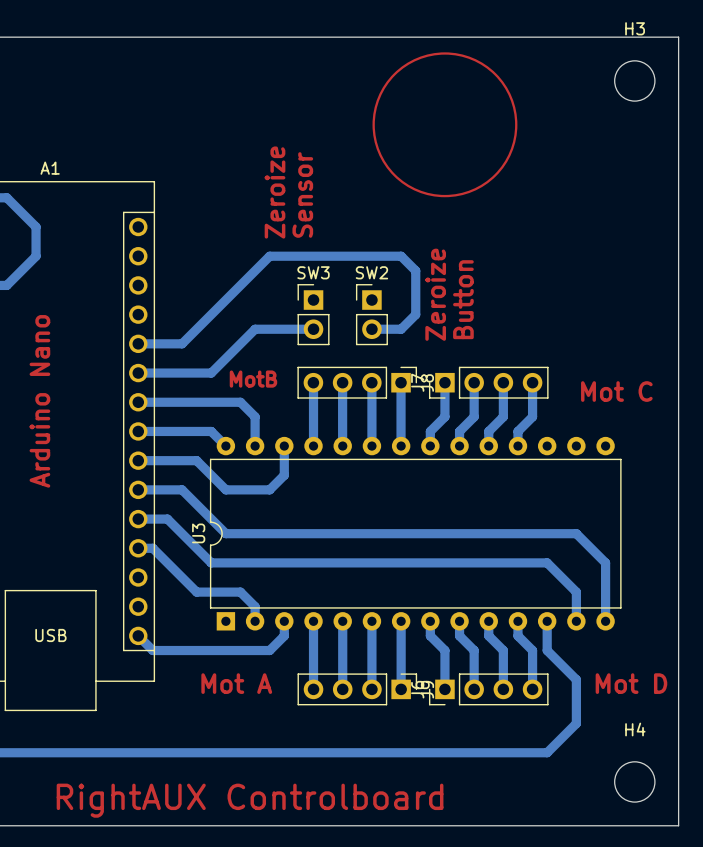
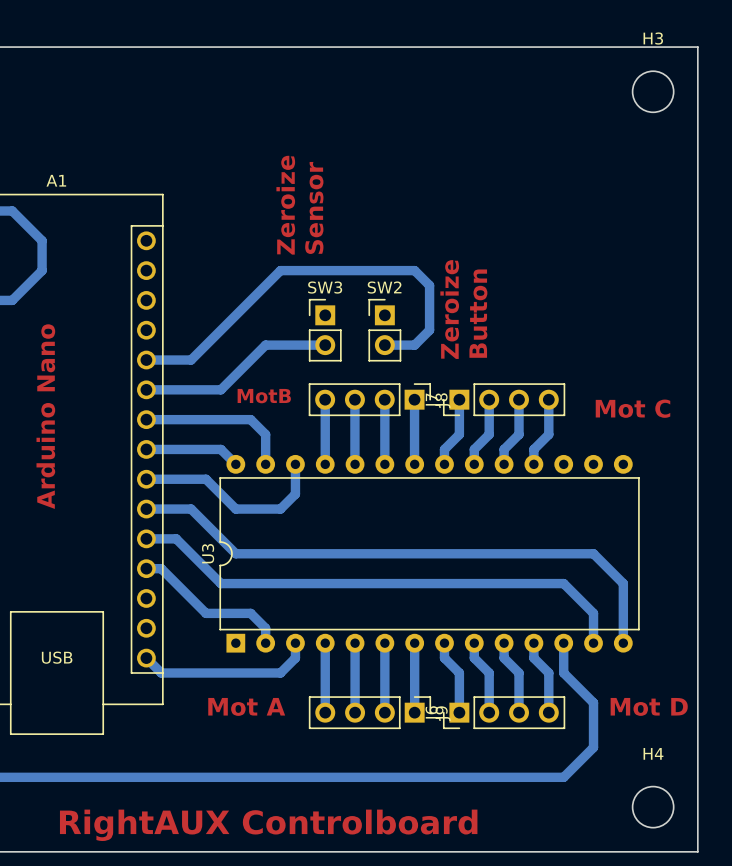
drawing: [372, 52, 518, 198] -> none

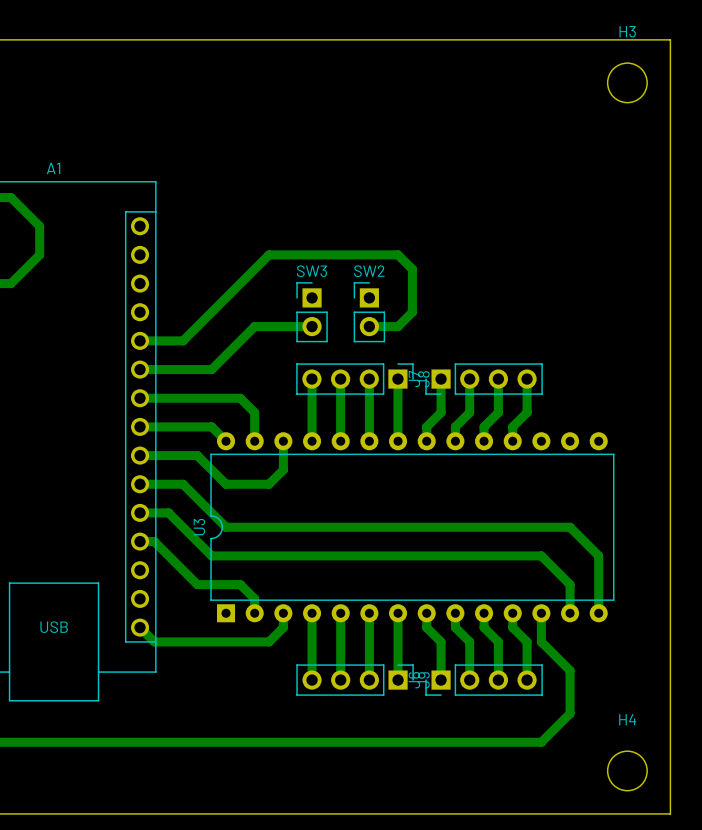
text: Zeroize (285, 205) -> none
text: Sensor (314, 207) -> none
text: Zeroize (449, 309) -> none
text: Button (478, 313) -> none
text: MotB (264, 396) -> none
text: Mot C (633, 408) -> none
text: Arduino Nano (45, 416) -> none
text: Mot A (246, 706) -> none
text: Mot D (649, 706) -> none
text: RightAUX Controlboard (268, 825) -> none

